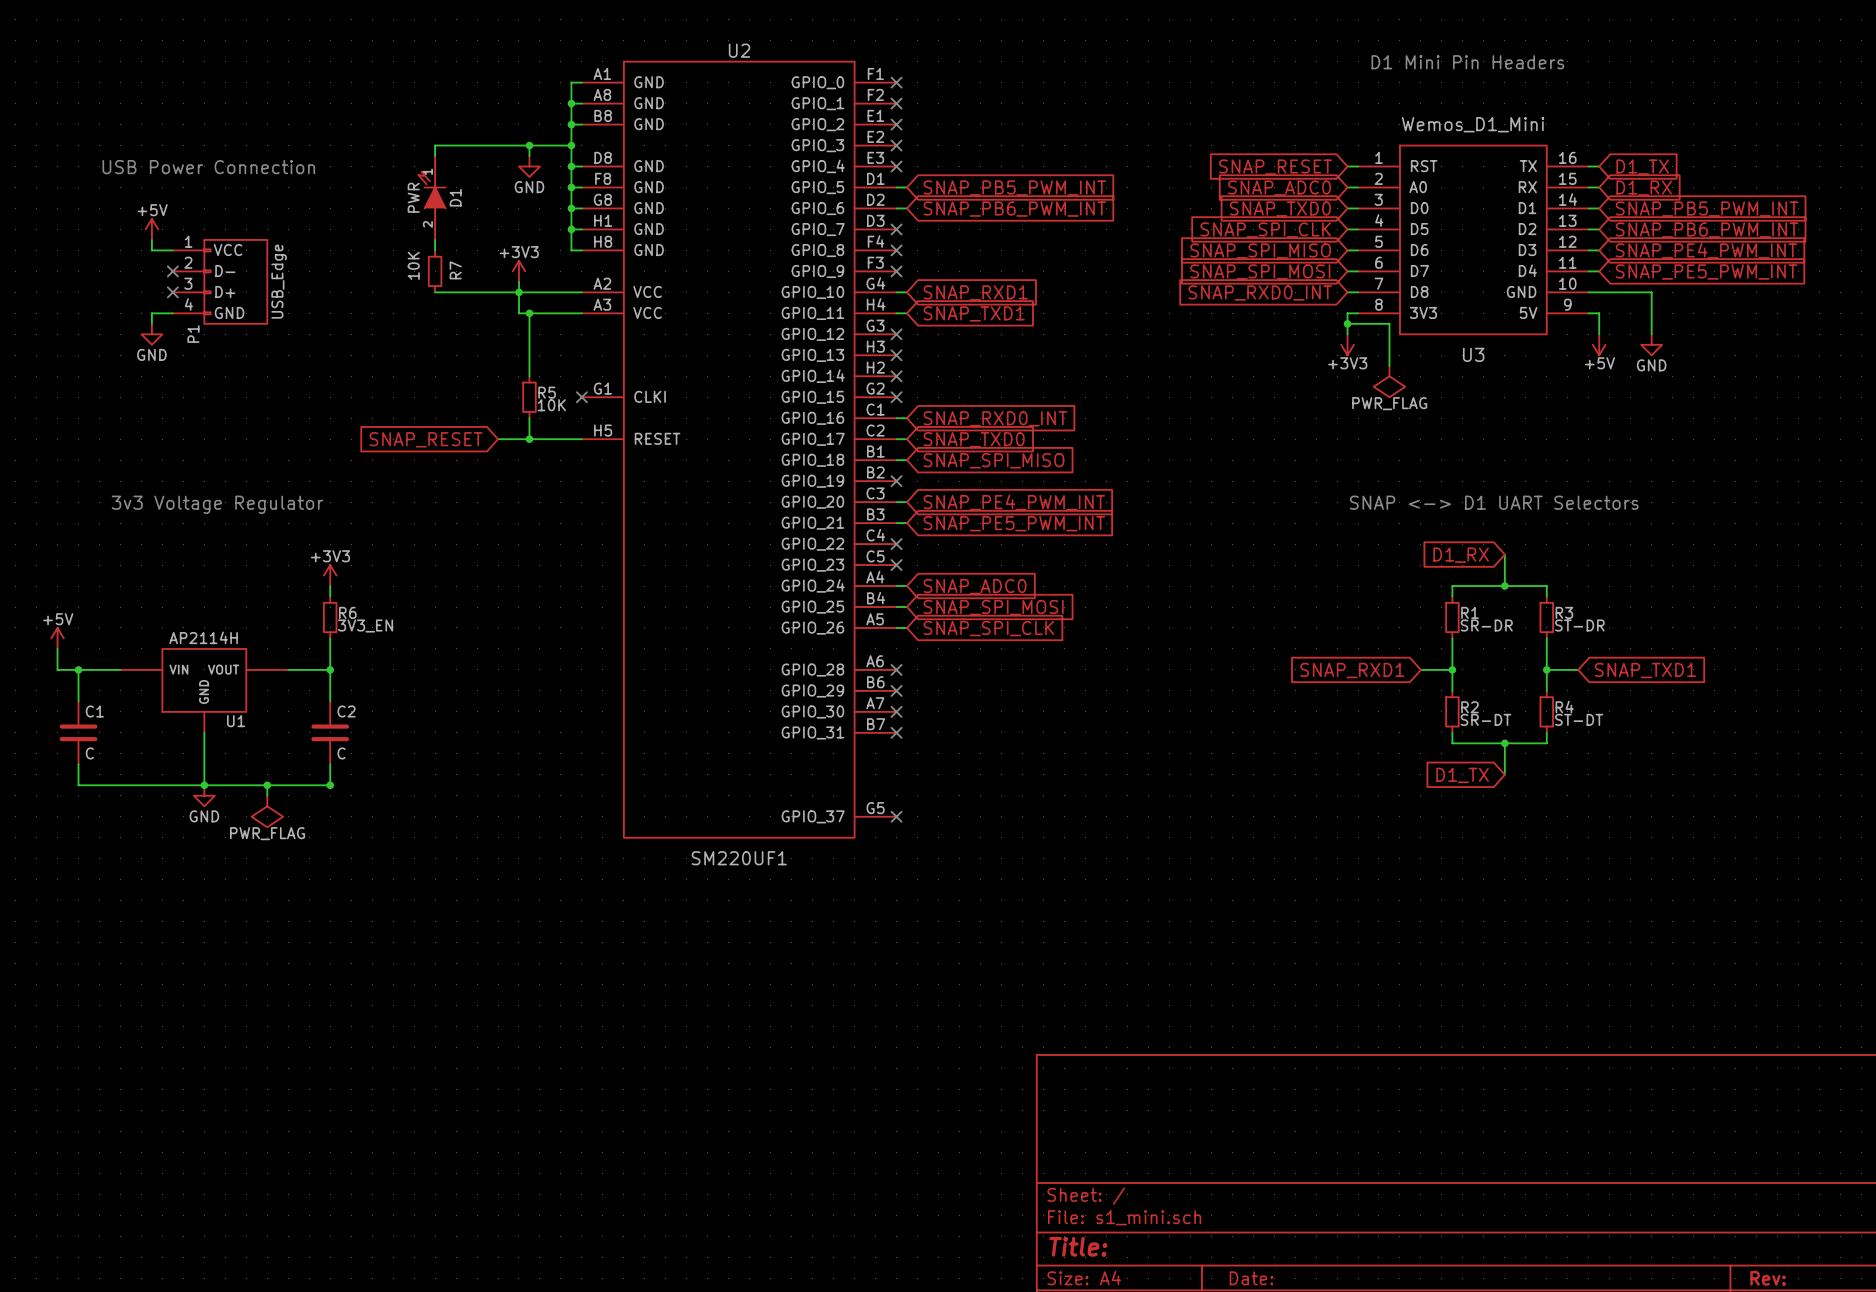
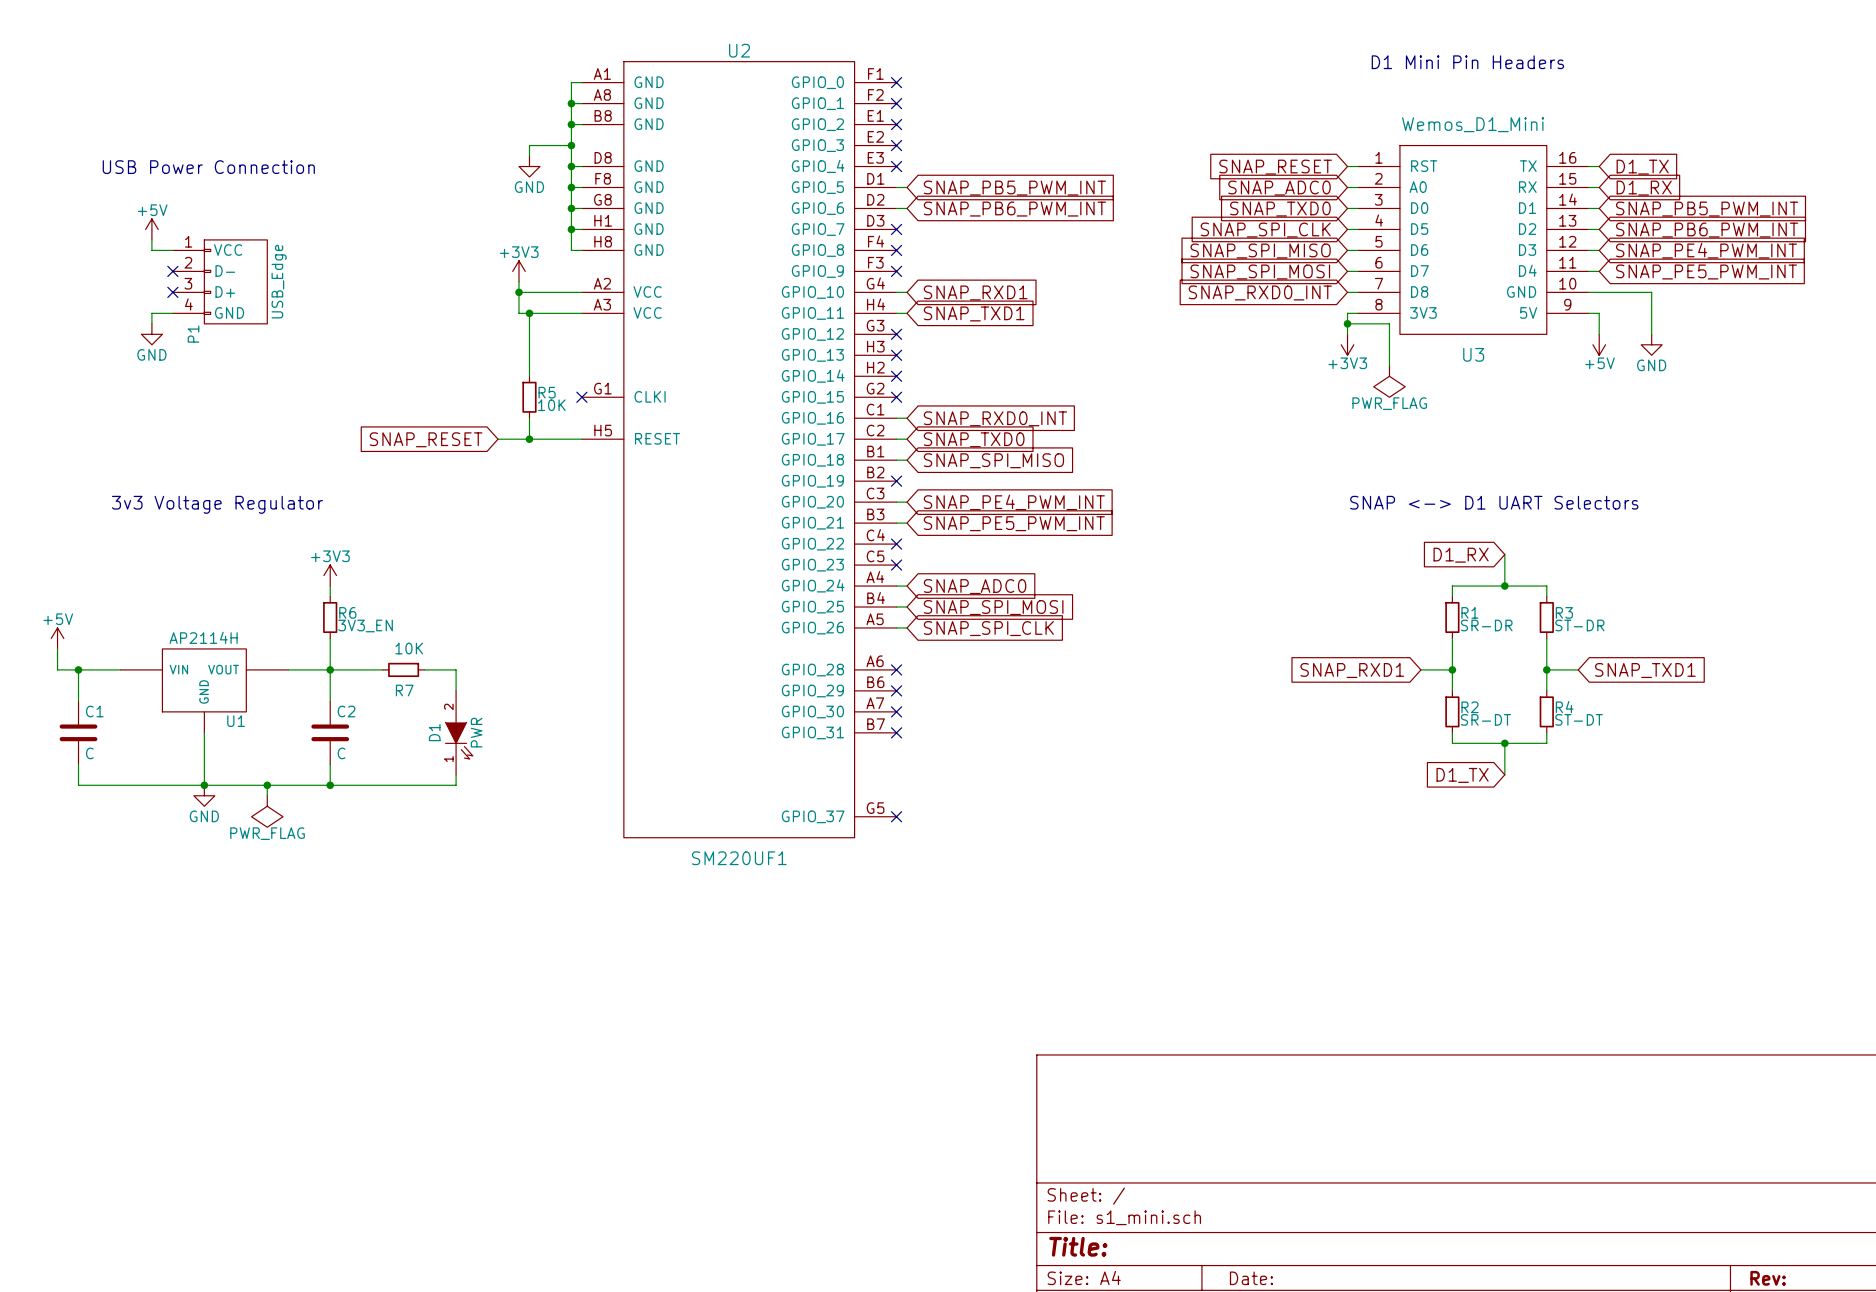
wire: (529, 145) (435, 145) (435, 156) -> none
junction: (529, 145) -> none
D1 rotation: 0° (431, 190) -> 180° (459, 740)
D1 position: (431, 197) -> (459, 732)
wire: (435, 239) (435, 250) -> none
R7 rotation: 0° (435, 271) -> 90° clockwise (403, 669)
R7 position: (435, 271) -> (403, 669)
wire: (435, 292) (518, 292) -> none
wire: none -> (330, 669) (382, 669)
wire: none -> (424, 669) (456, 669) (456, 690)
wire: none -> (456, 774) (456, 785) (330, 785)

